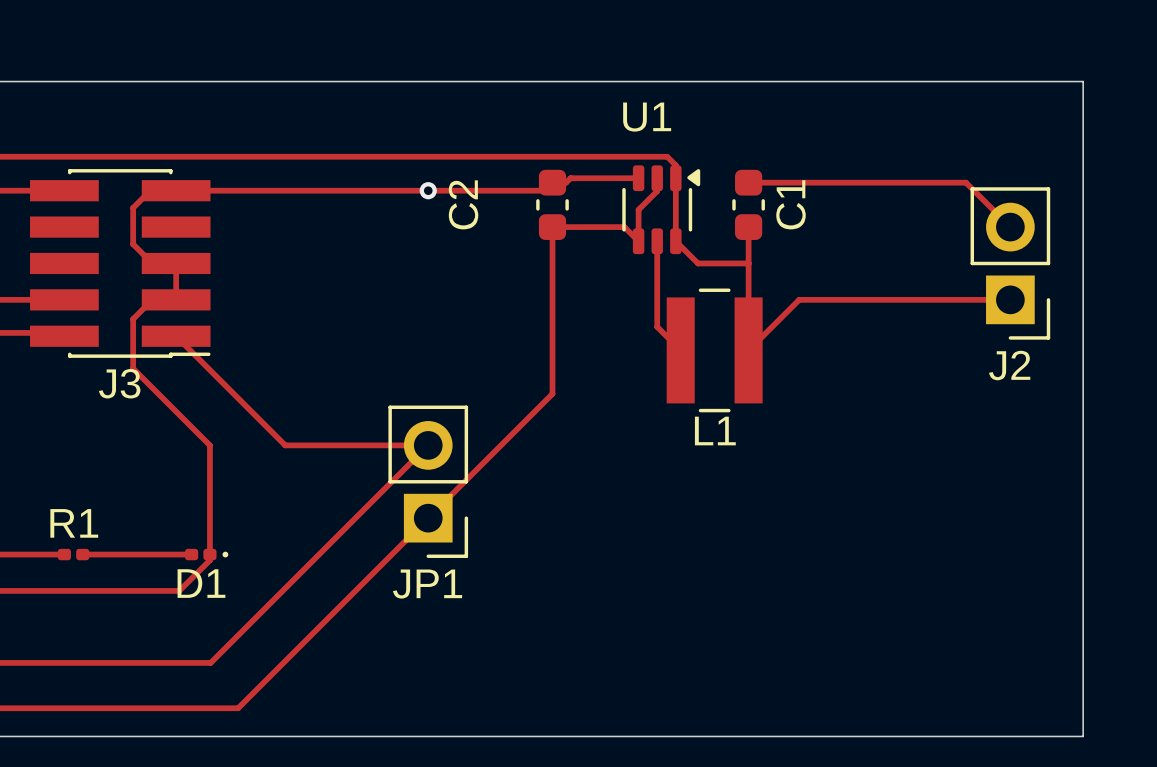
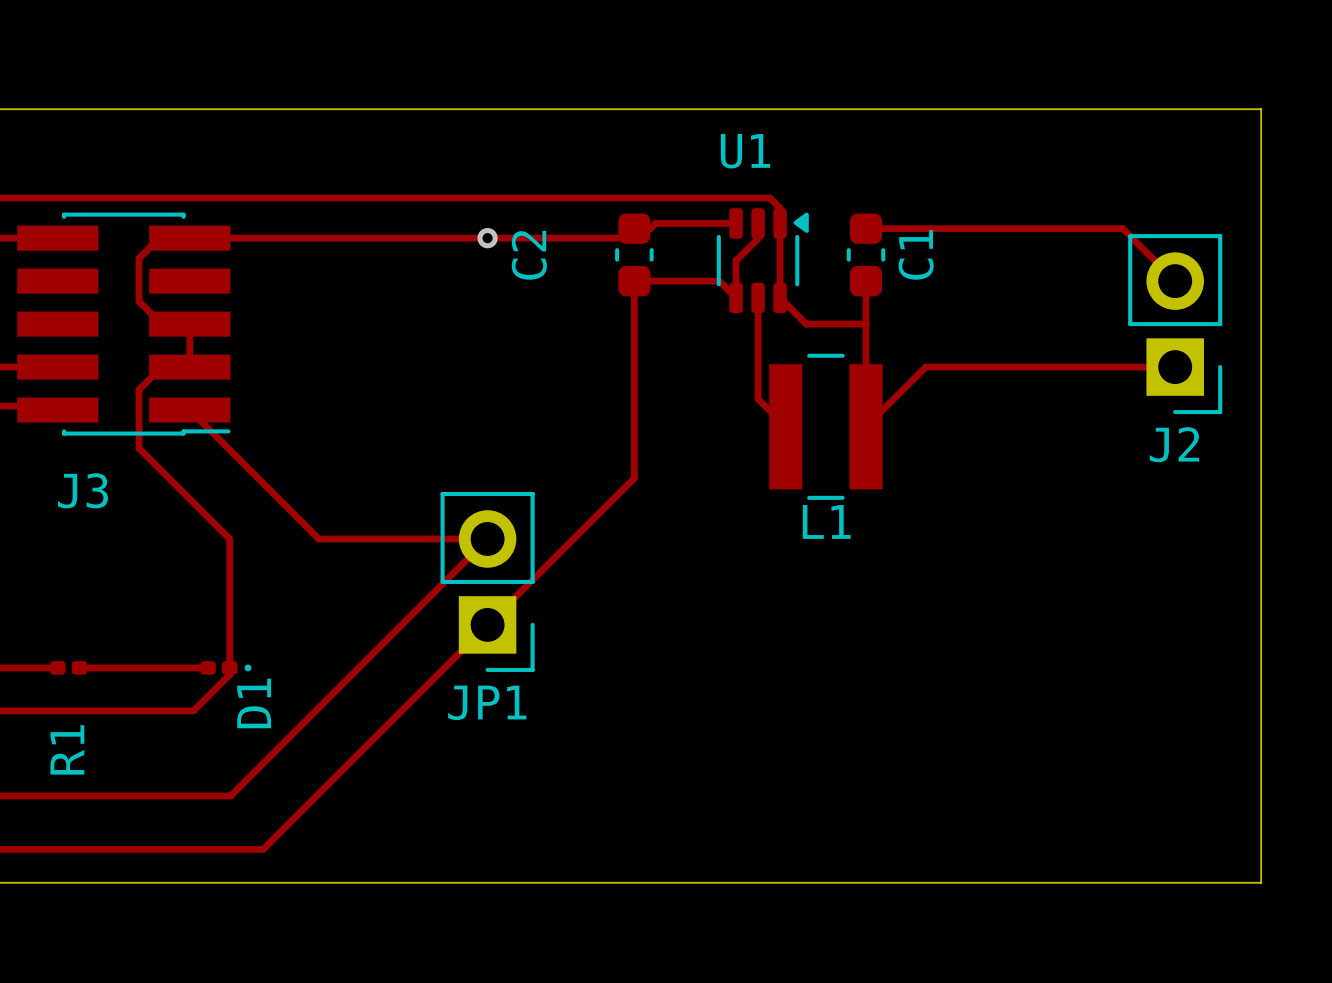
J3 name position: J3 (119, 383) -> J3 (83, 490)
R1 name rotation: 0° (74, 523) -> 90° counterclockwise (67, 749)
R1 name position: R1 (74, 523) -> R1 (67, 749)
D1 name rotation: 0° (201, 583) -> 90° counterclockwise (254, 703)

